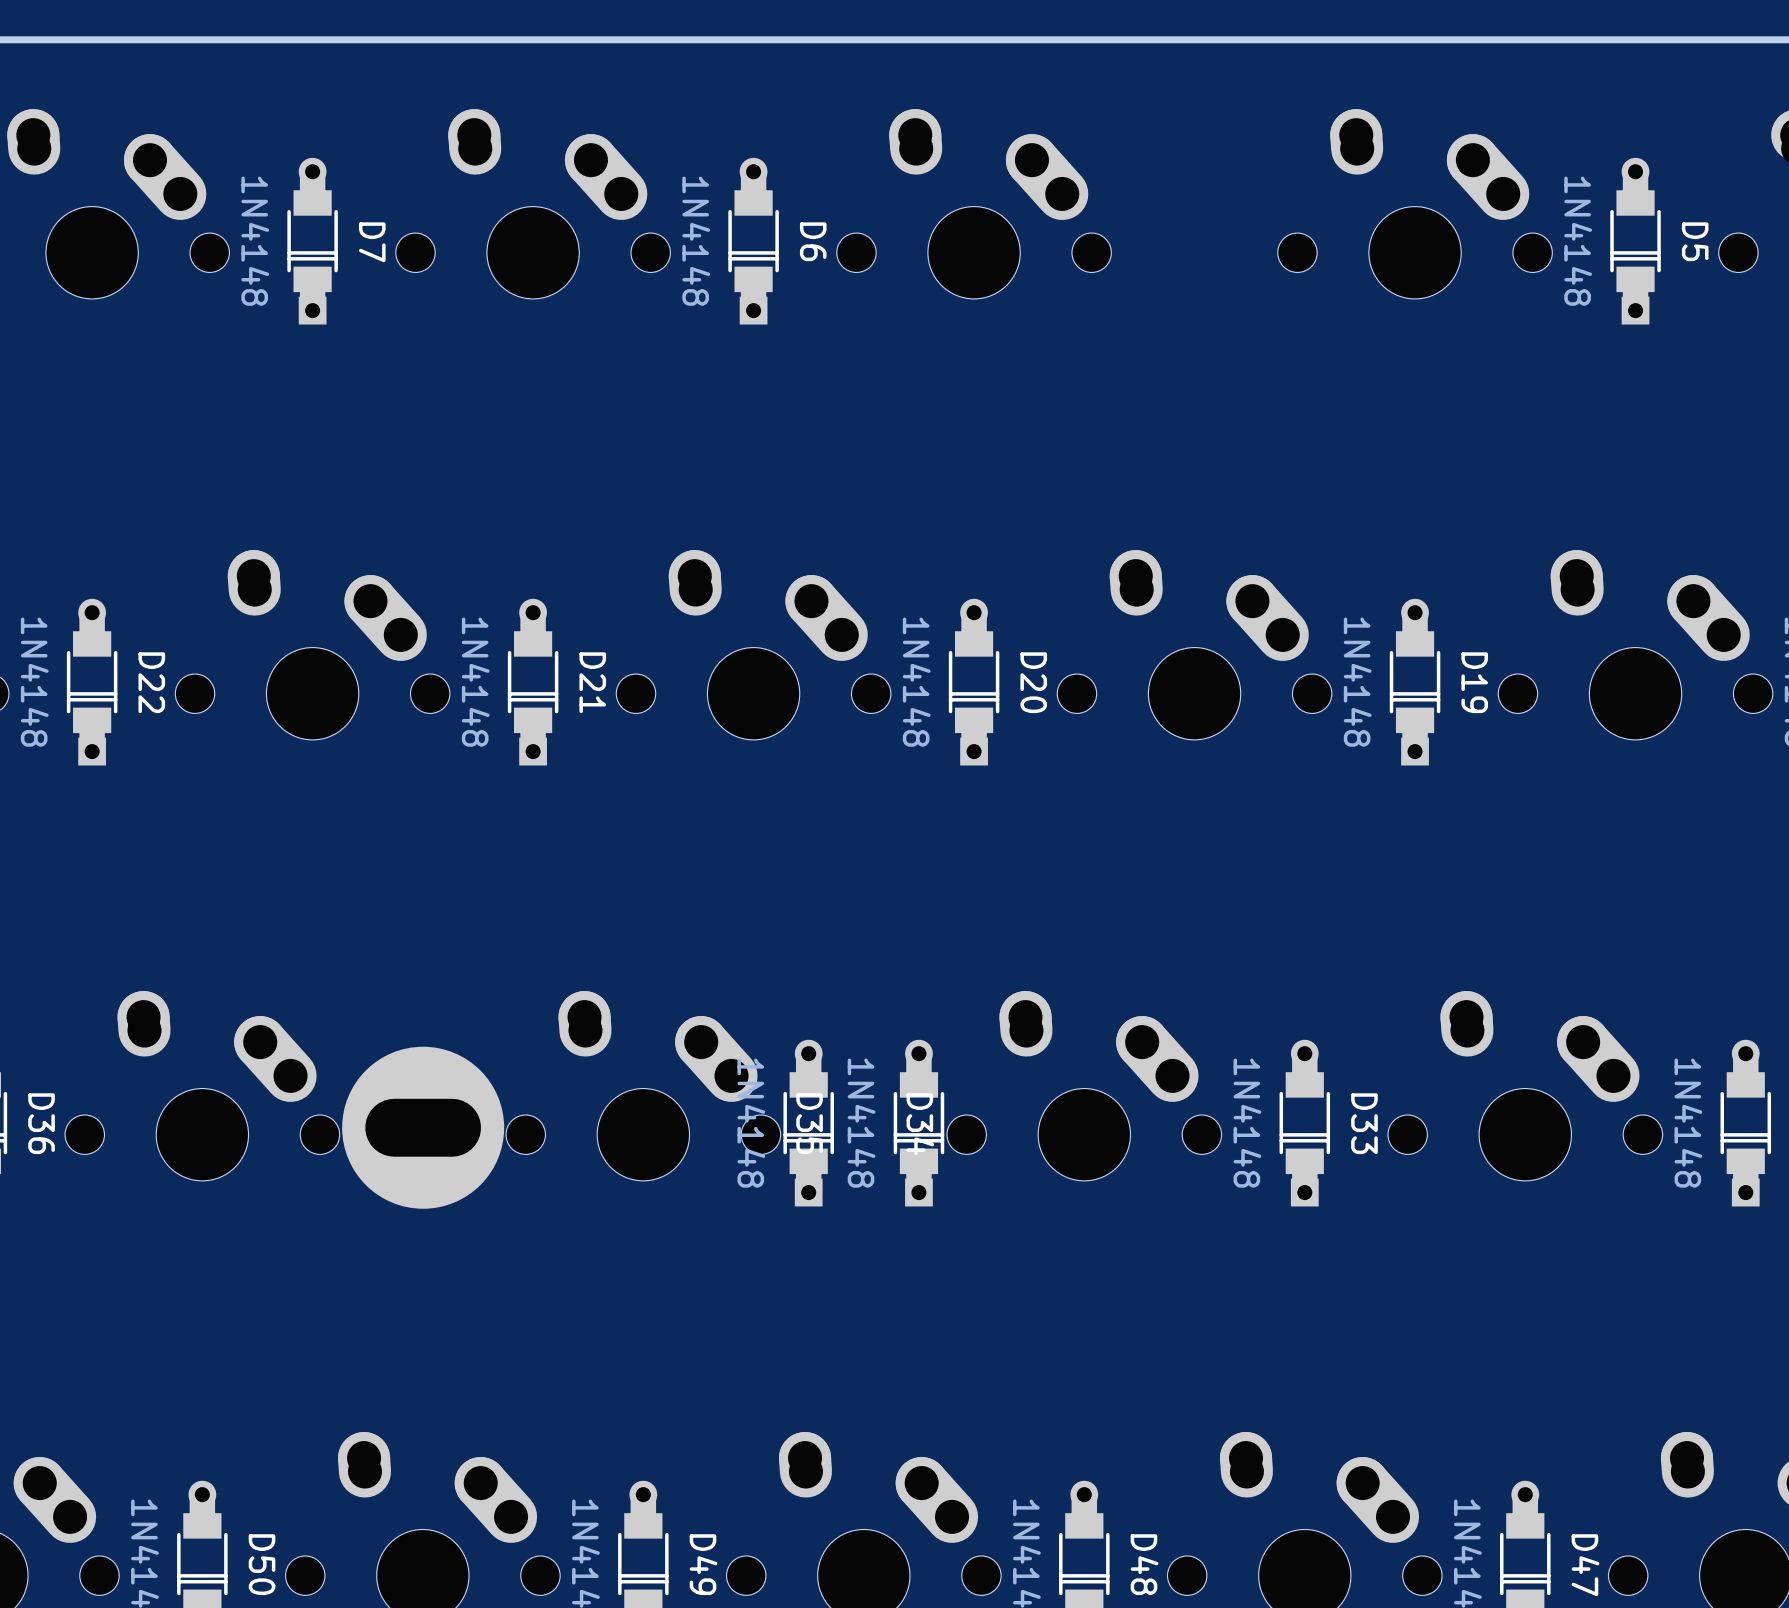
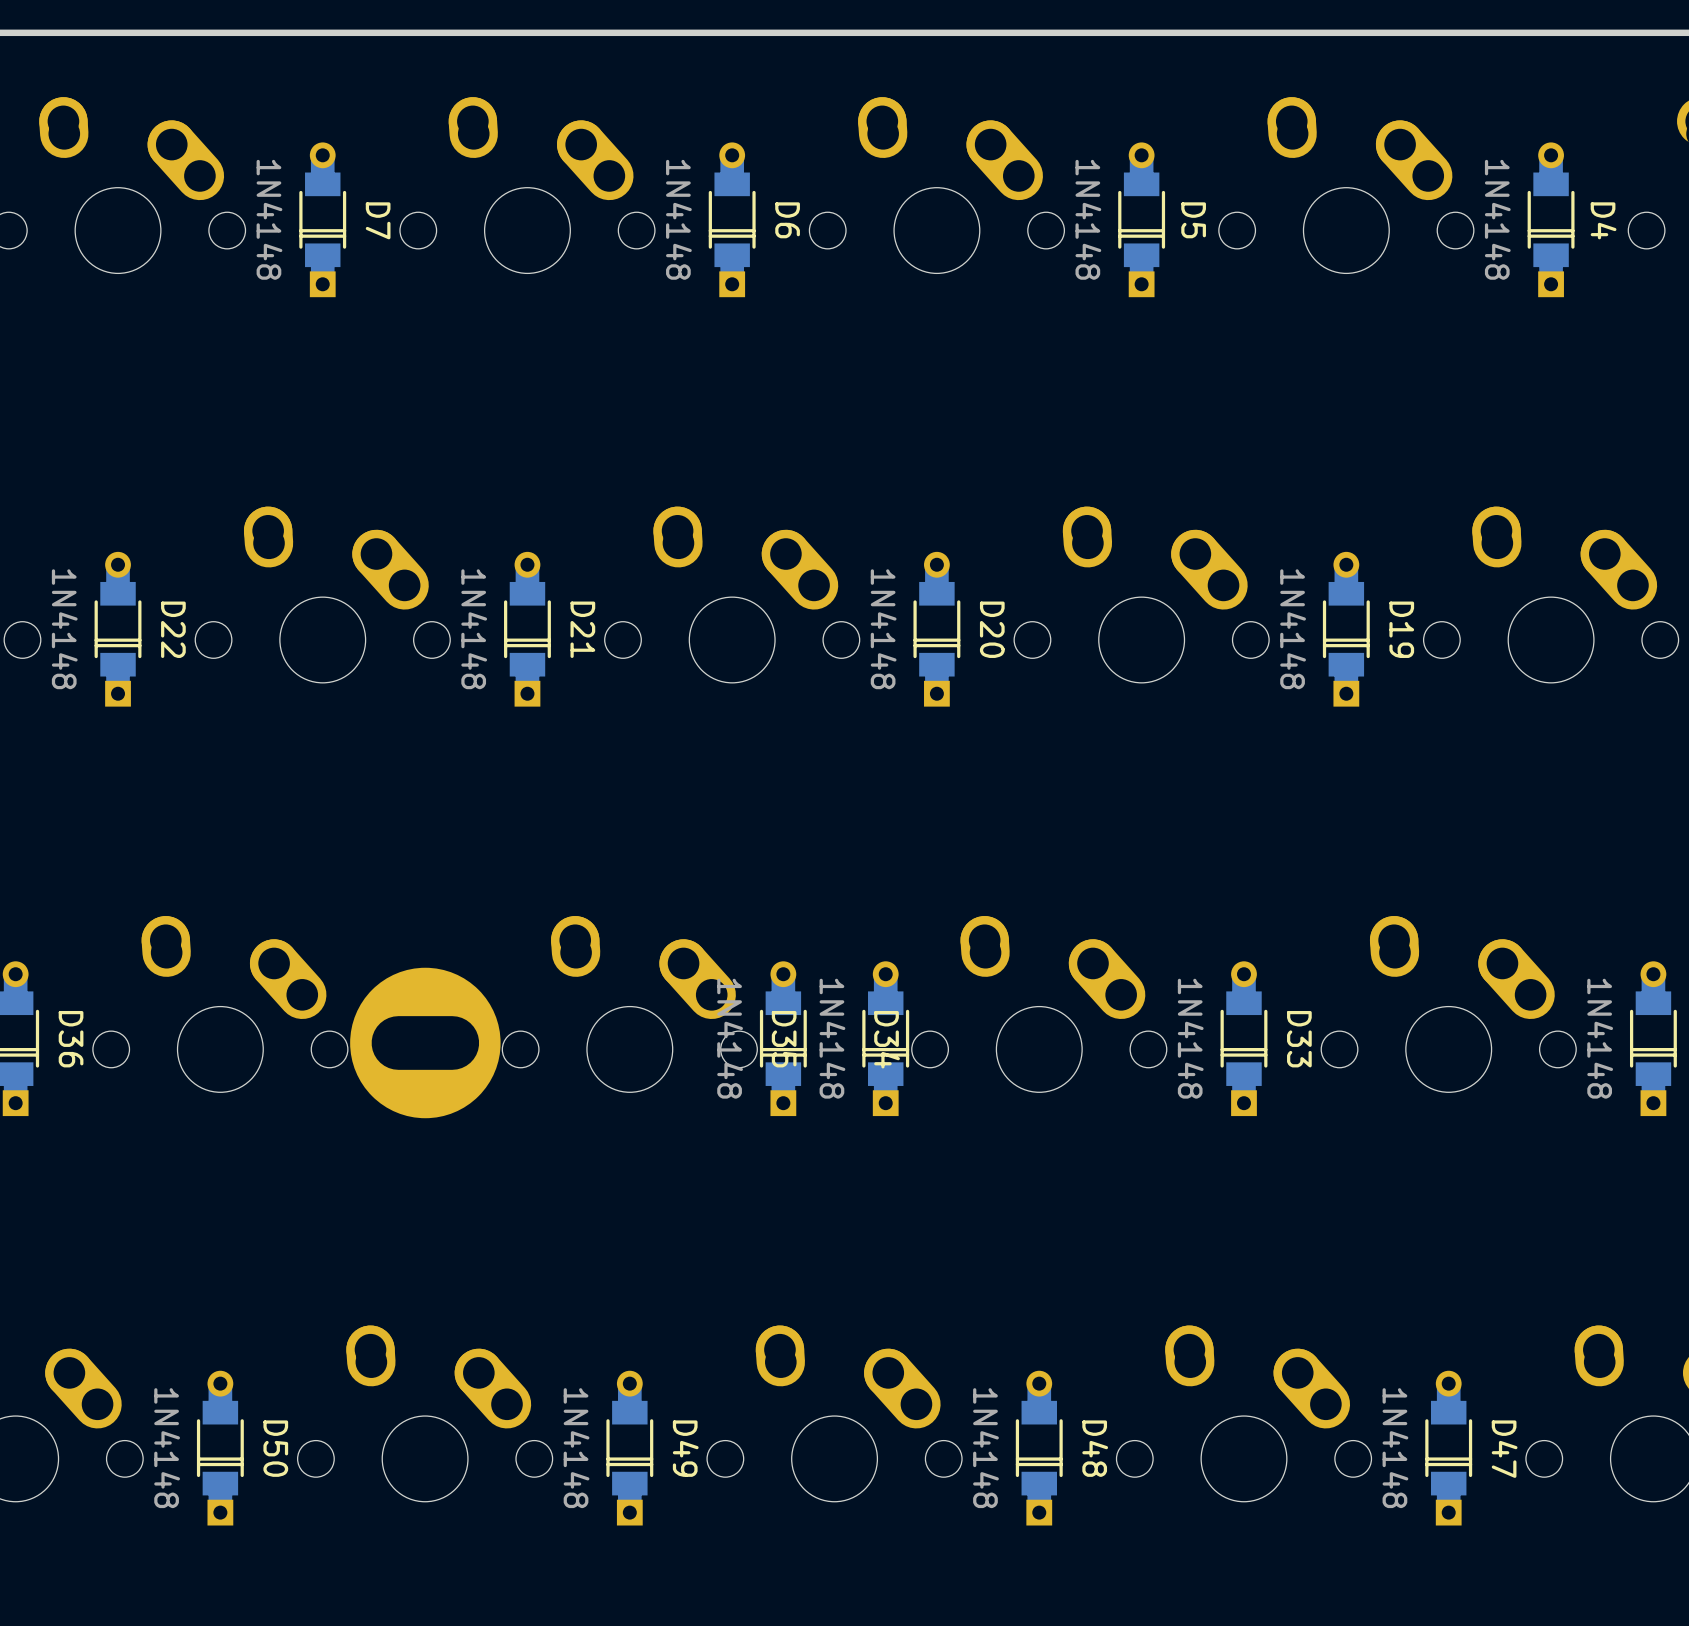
D5: none -> 1N4148 (1141, 219)
D5 name: D5 (1695, 241) -> D4 (1603, 220)

